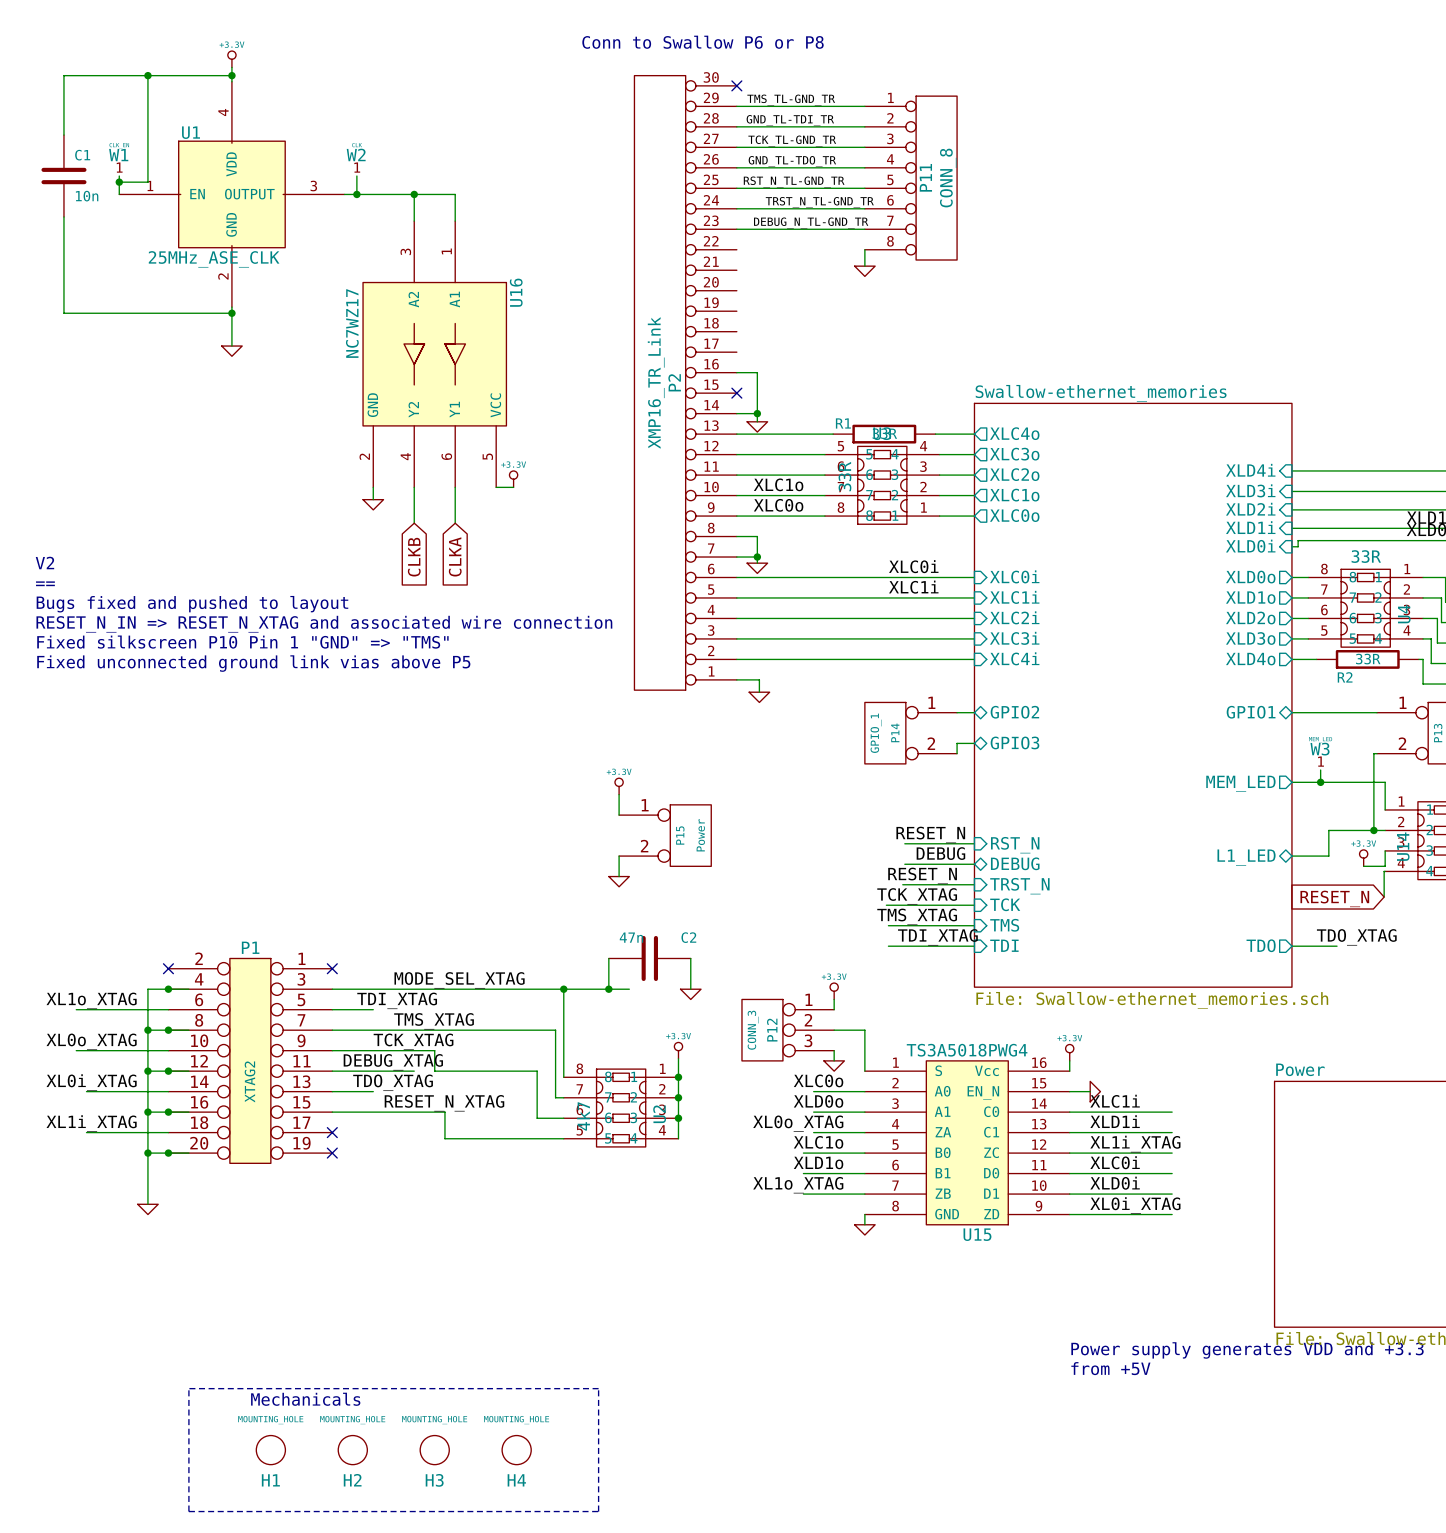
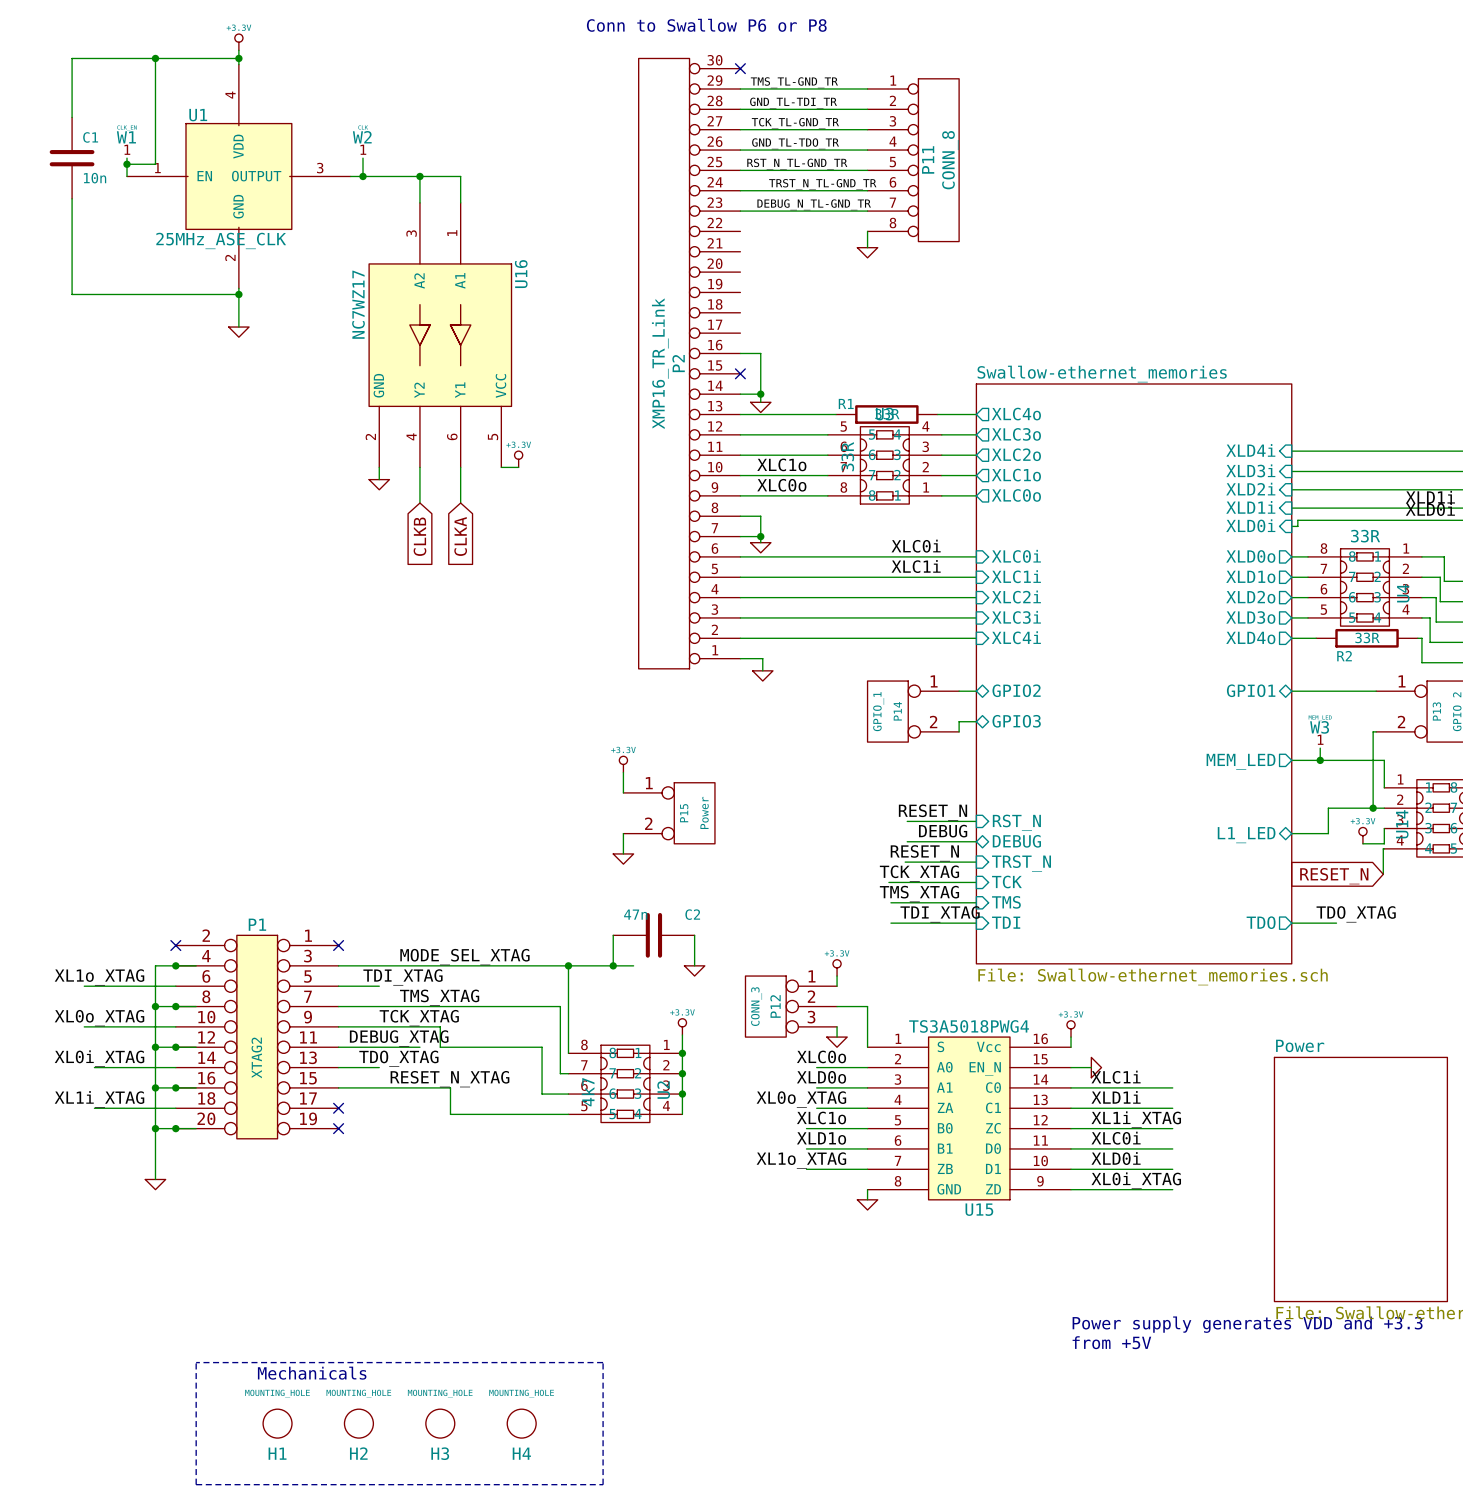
text: V2 (44, 563) -> none
text: == (45, 583) -> none
text: Bugs fixed and pushed to layout (192, 604) -> none
text: RESET_N_IN => RESET_N_XTAG and associated wire connection (324, 624) -> none
text: Fixed silkscreen P10 Pin 1 "GND" => "TMS" (242, 642) -> none
text: Fixed unconnected ground link vias above P5 (253, 663) -> none

